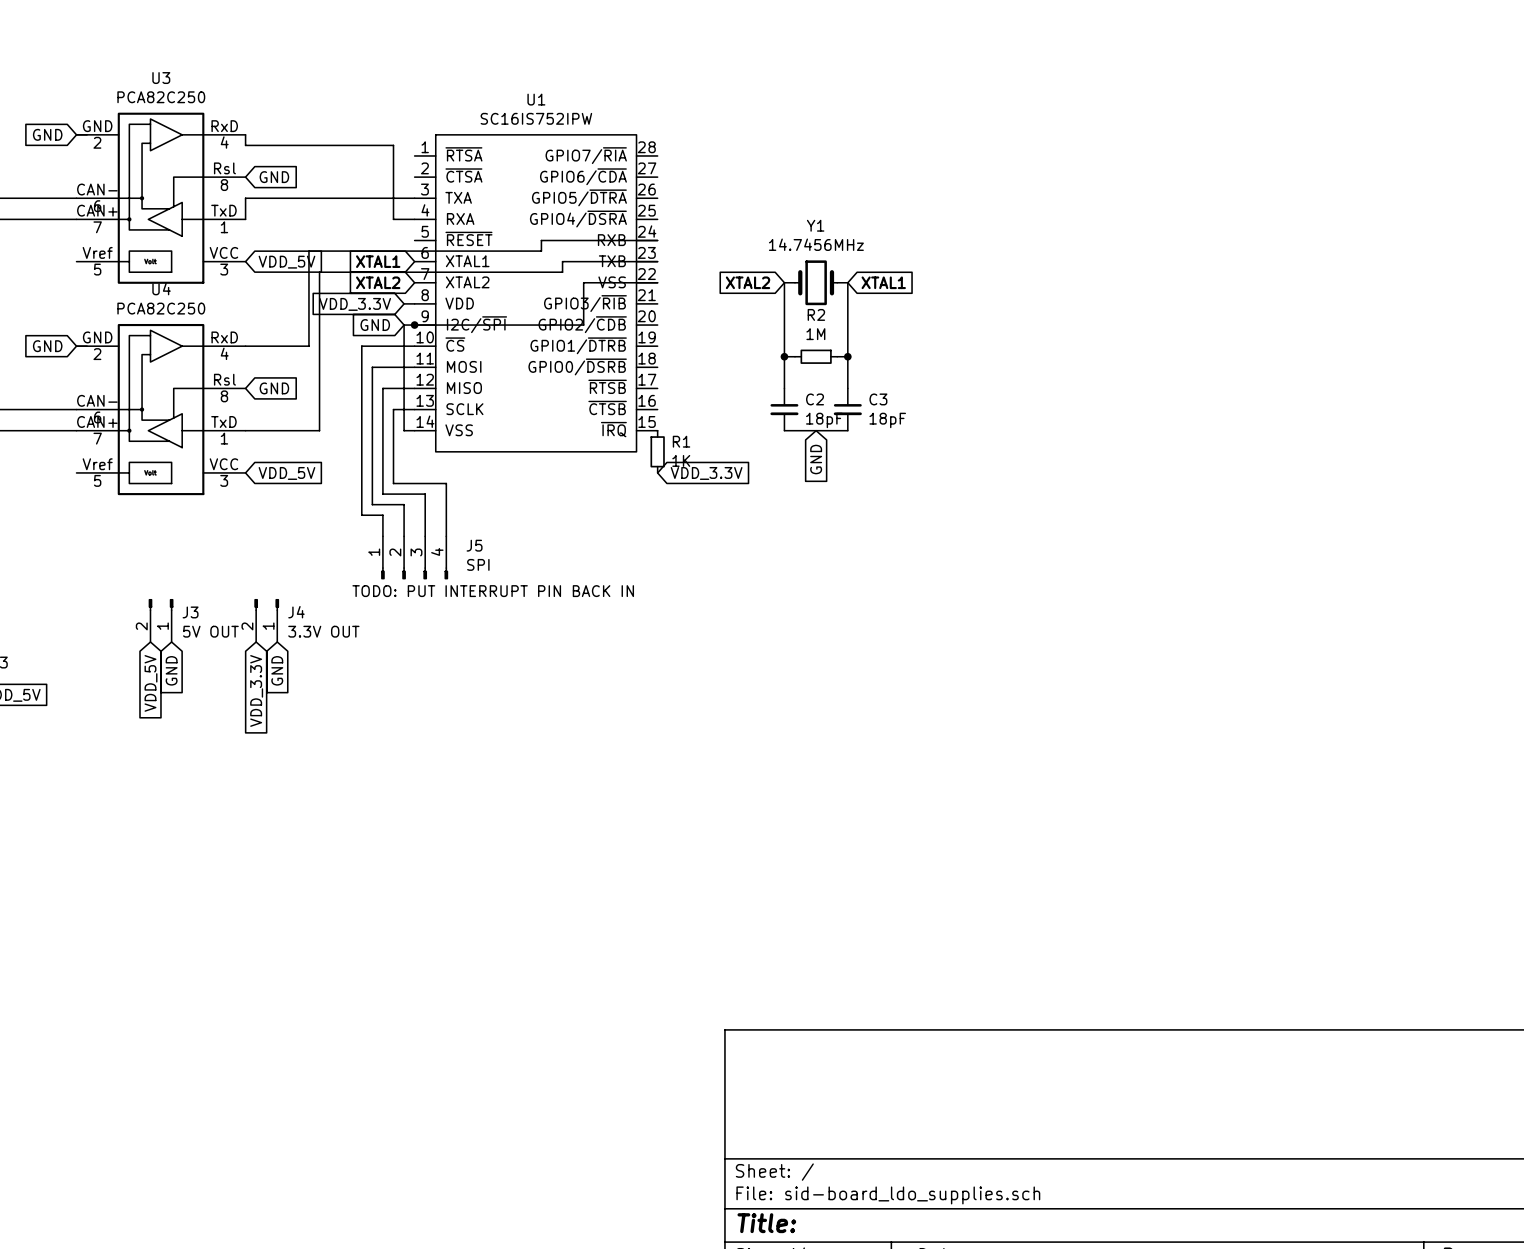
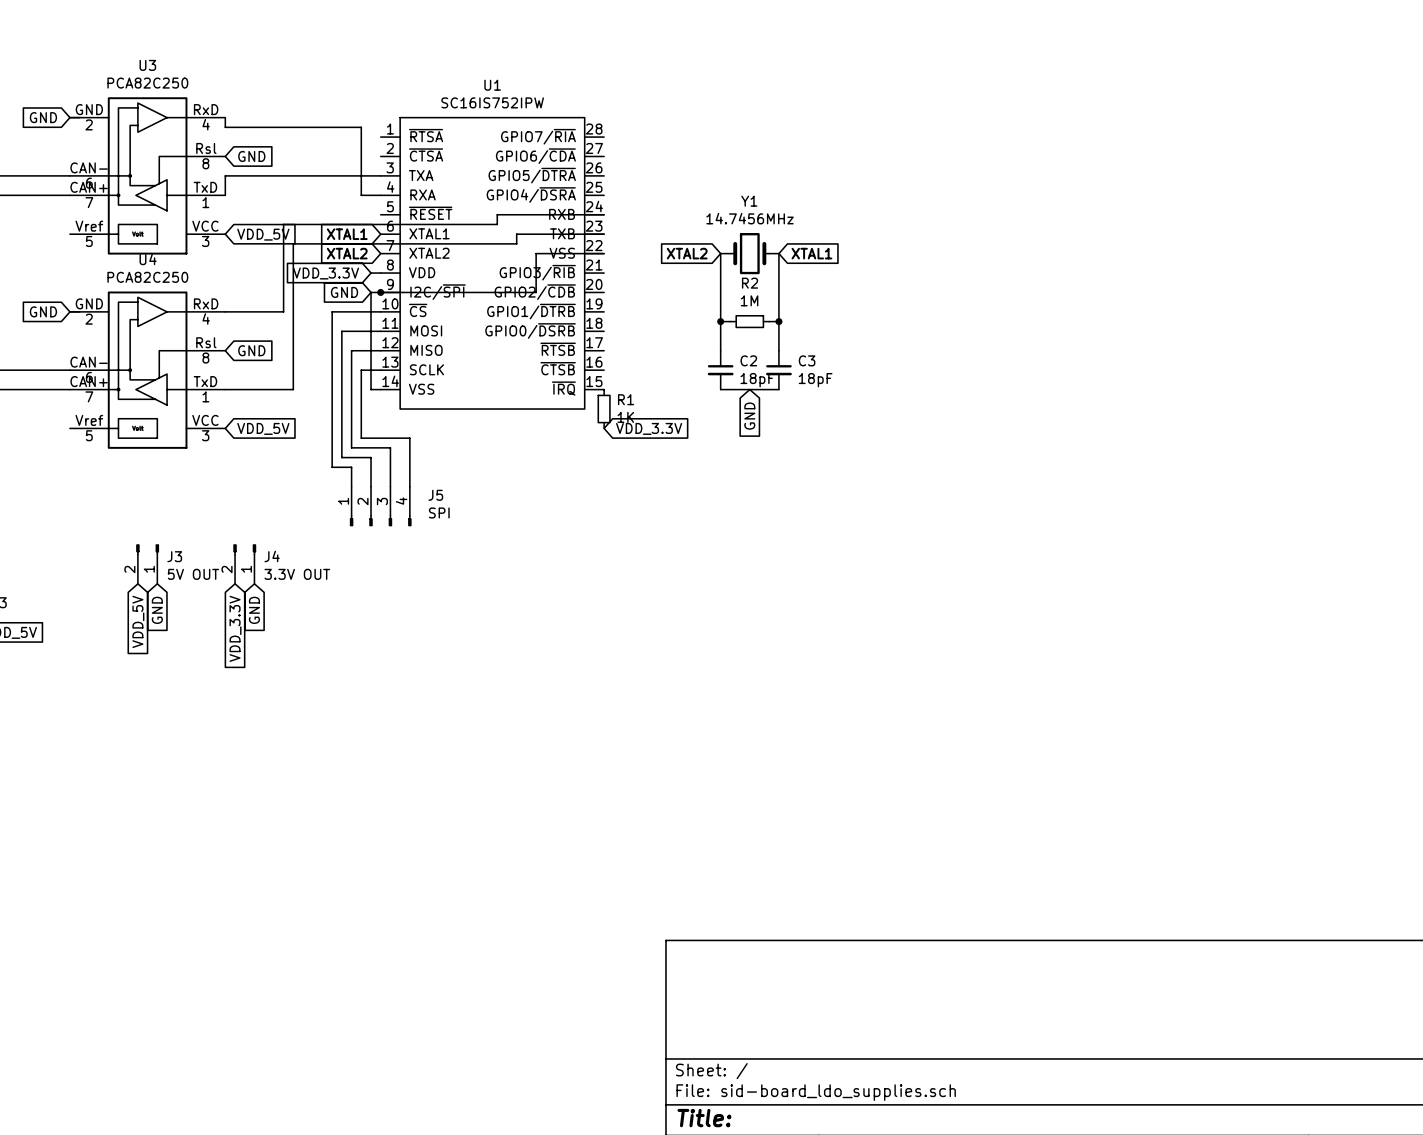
text: TODO: PUT INTERRUPT PIN BACK IN (493, 591) -> none

